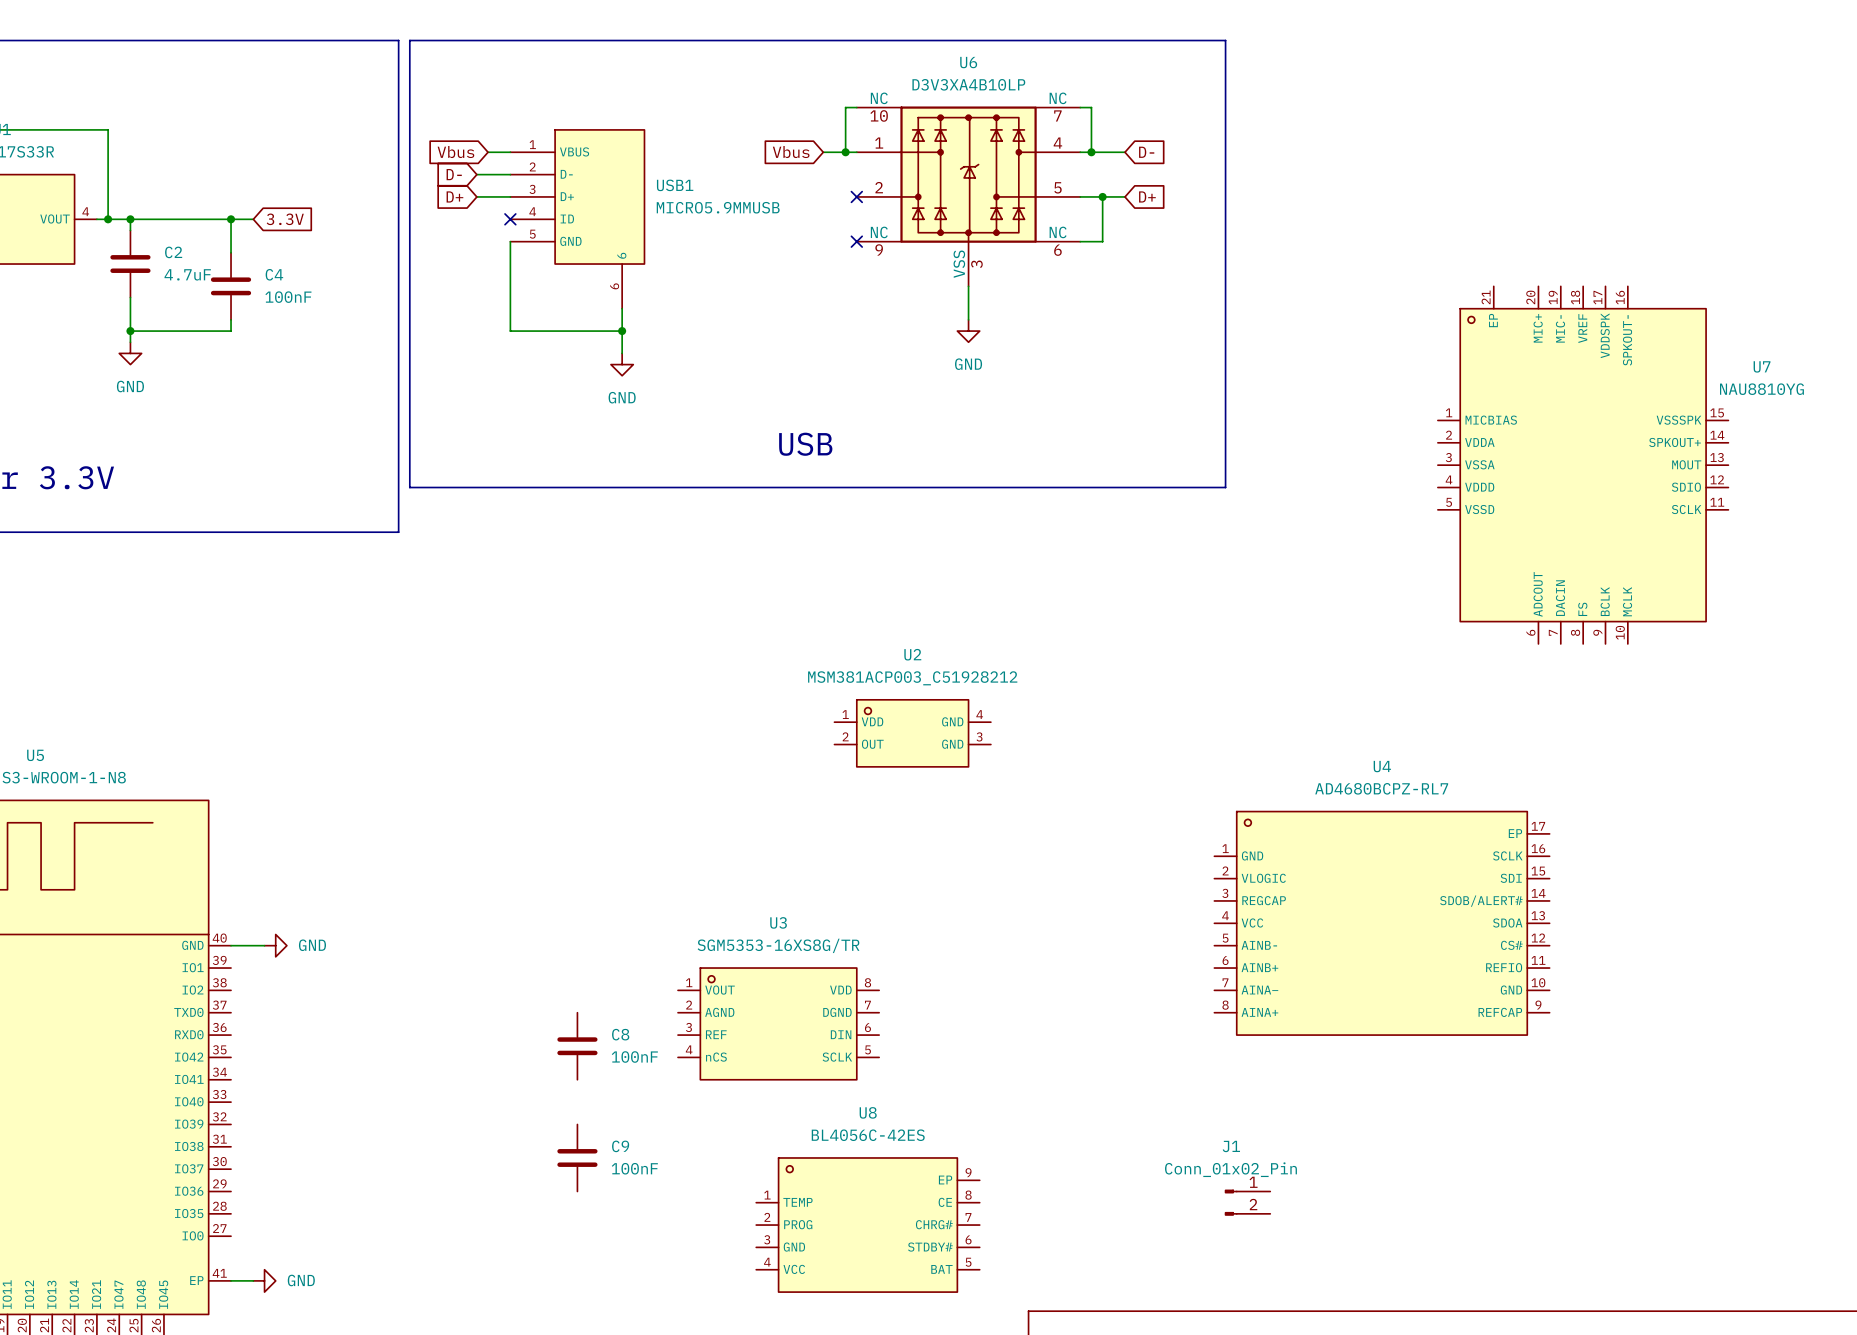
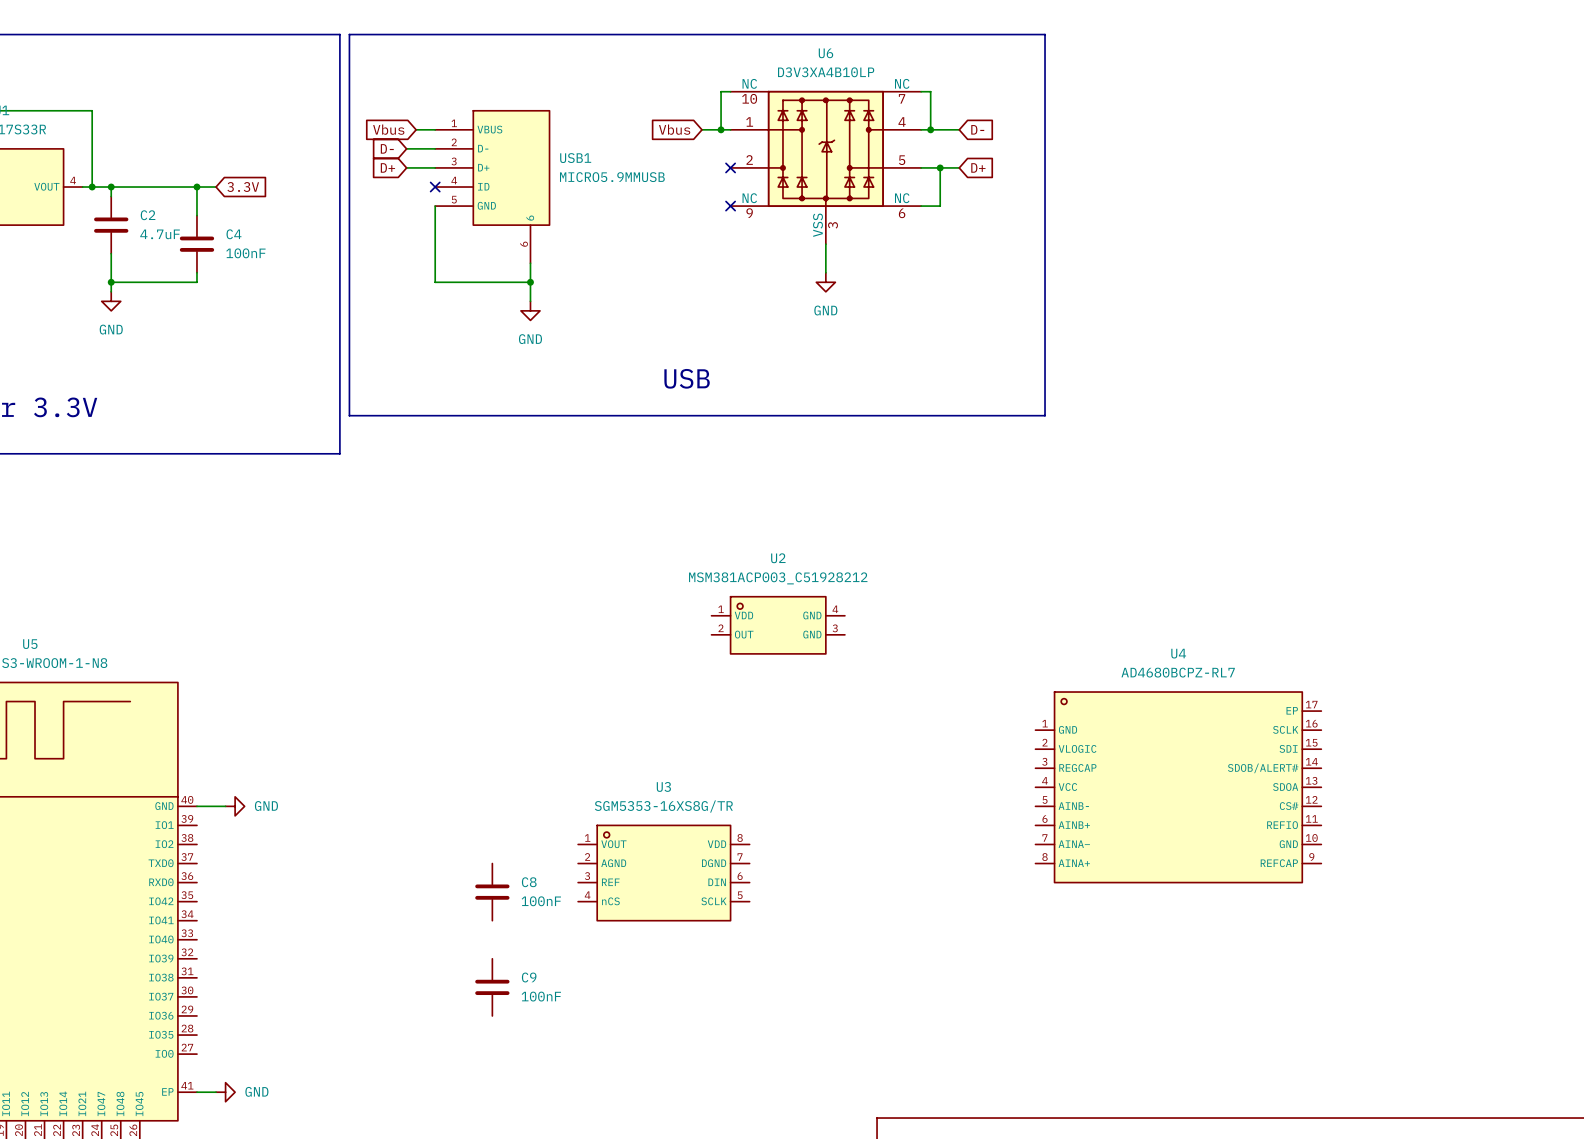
U7: NAU8810YG (1583, 465) -> none
J1: Conn_01x02_Pin (1247, 1202) -> none
U8: BL4056C-42ES (867, 1225) -> none

